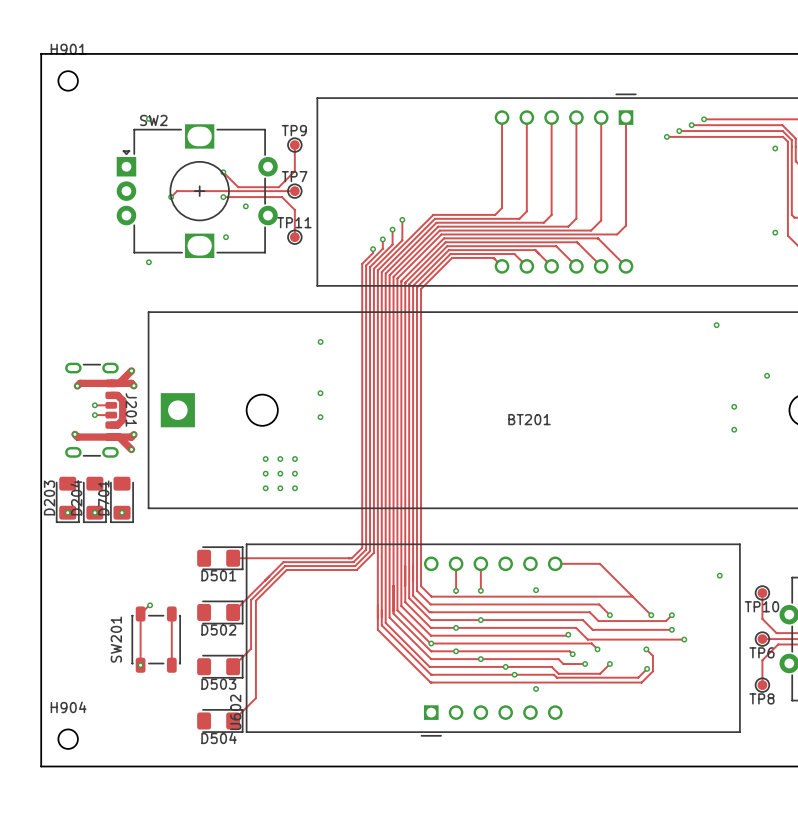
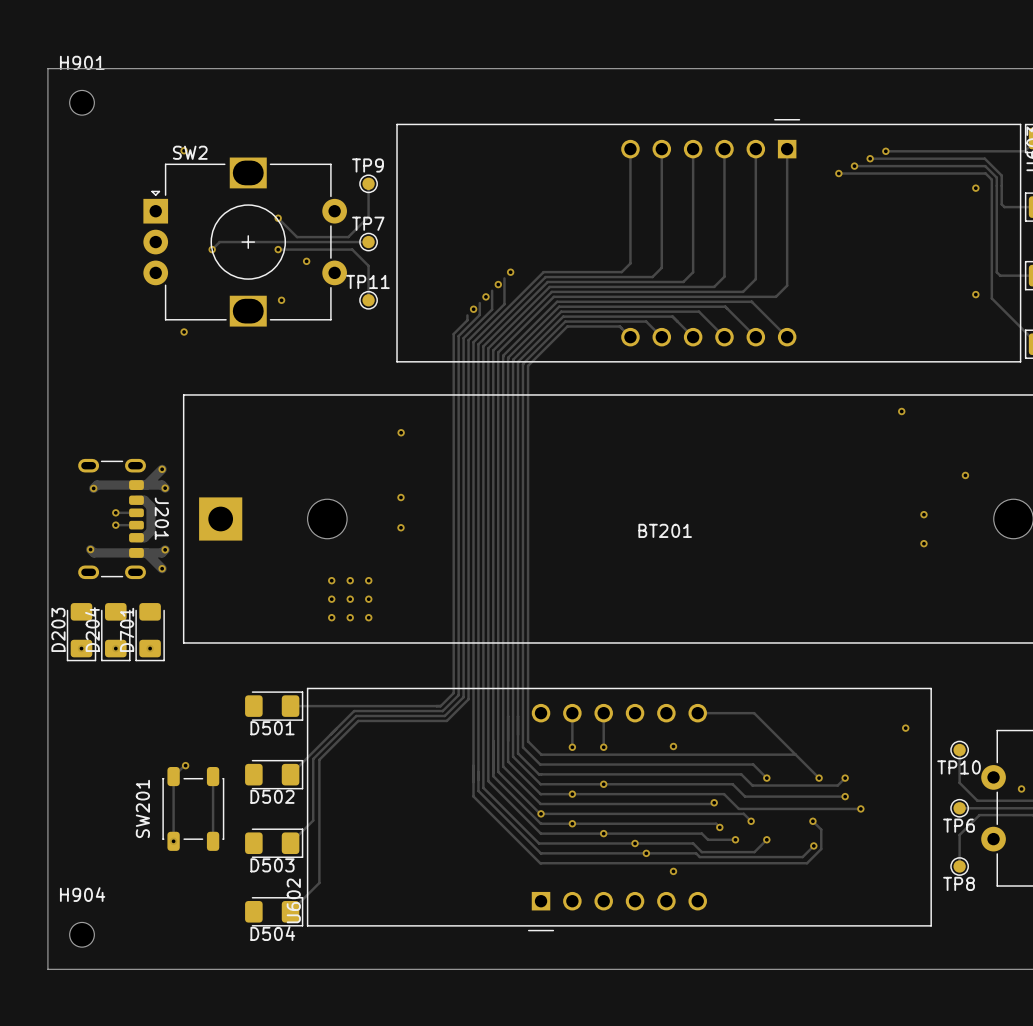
via: none -> (510, 272)
via: (402, 219) -> none
via: none -> (498, 284)
via: (392, 229) -> none
via: none -> (485, 296)
via: (382, 239) -> none
via: none -> (473, 309)
via: (373, 249) -> none

